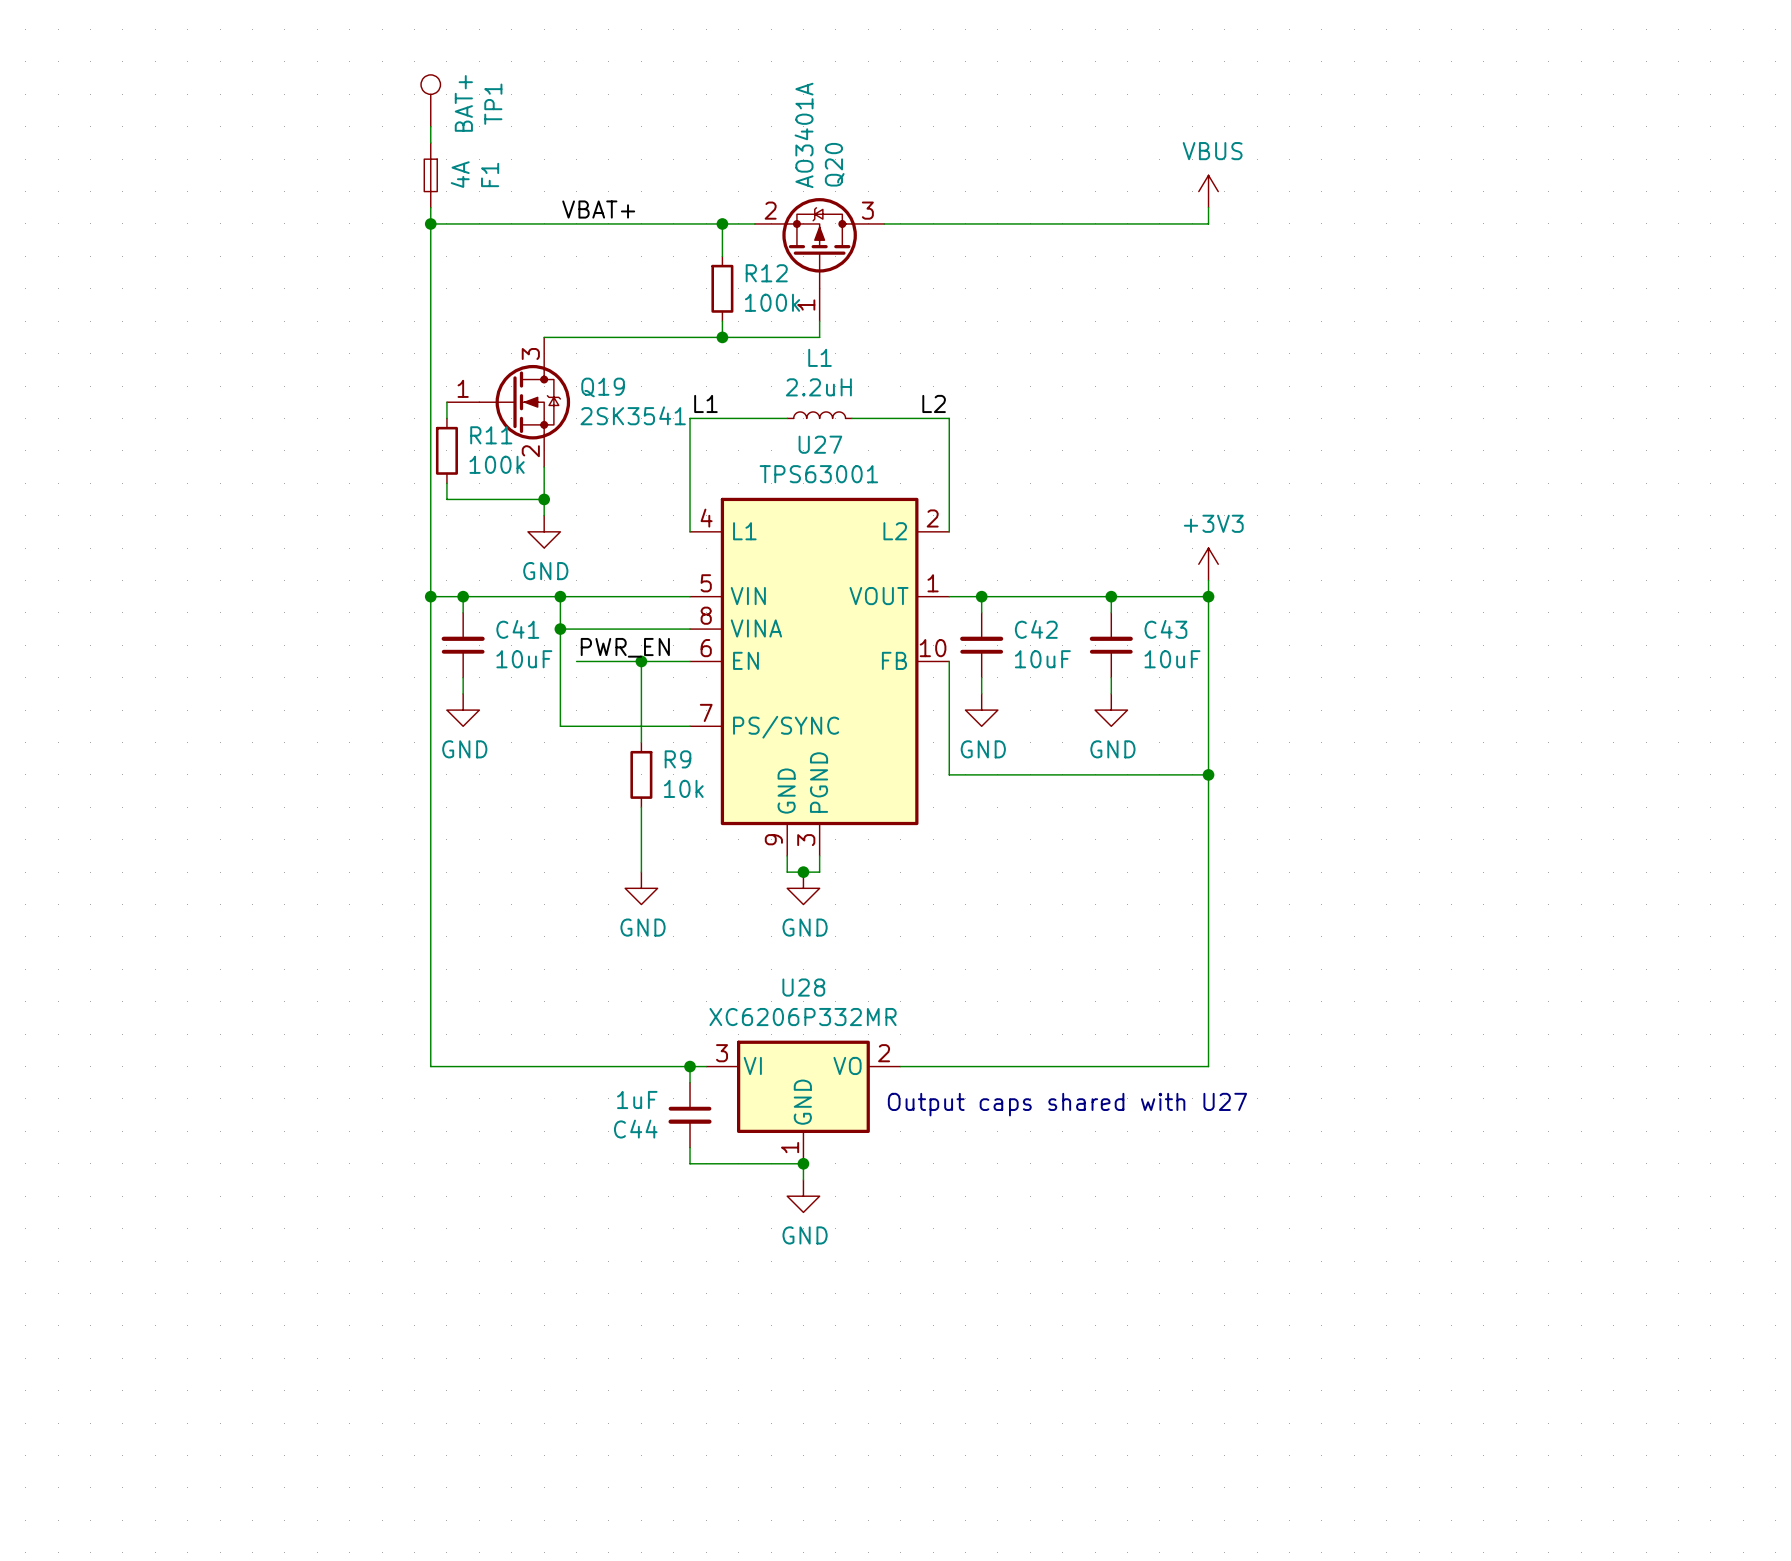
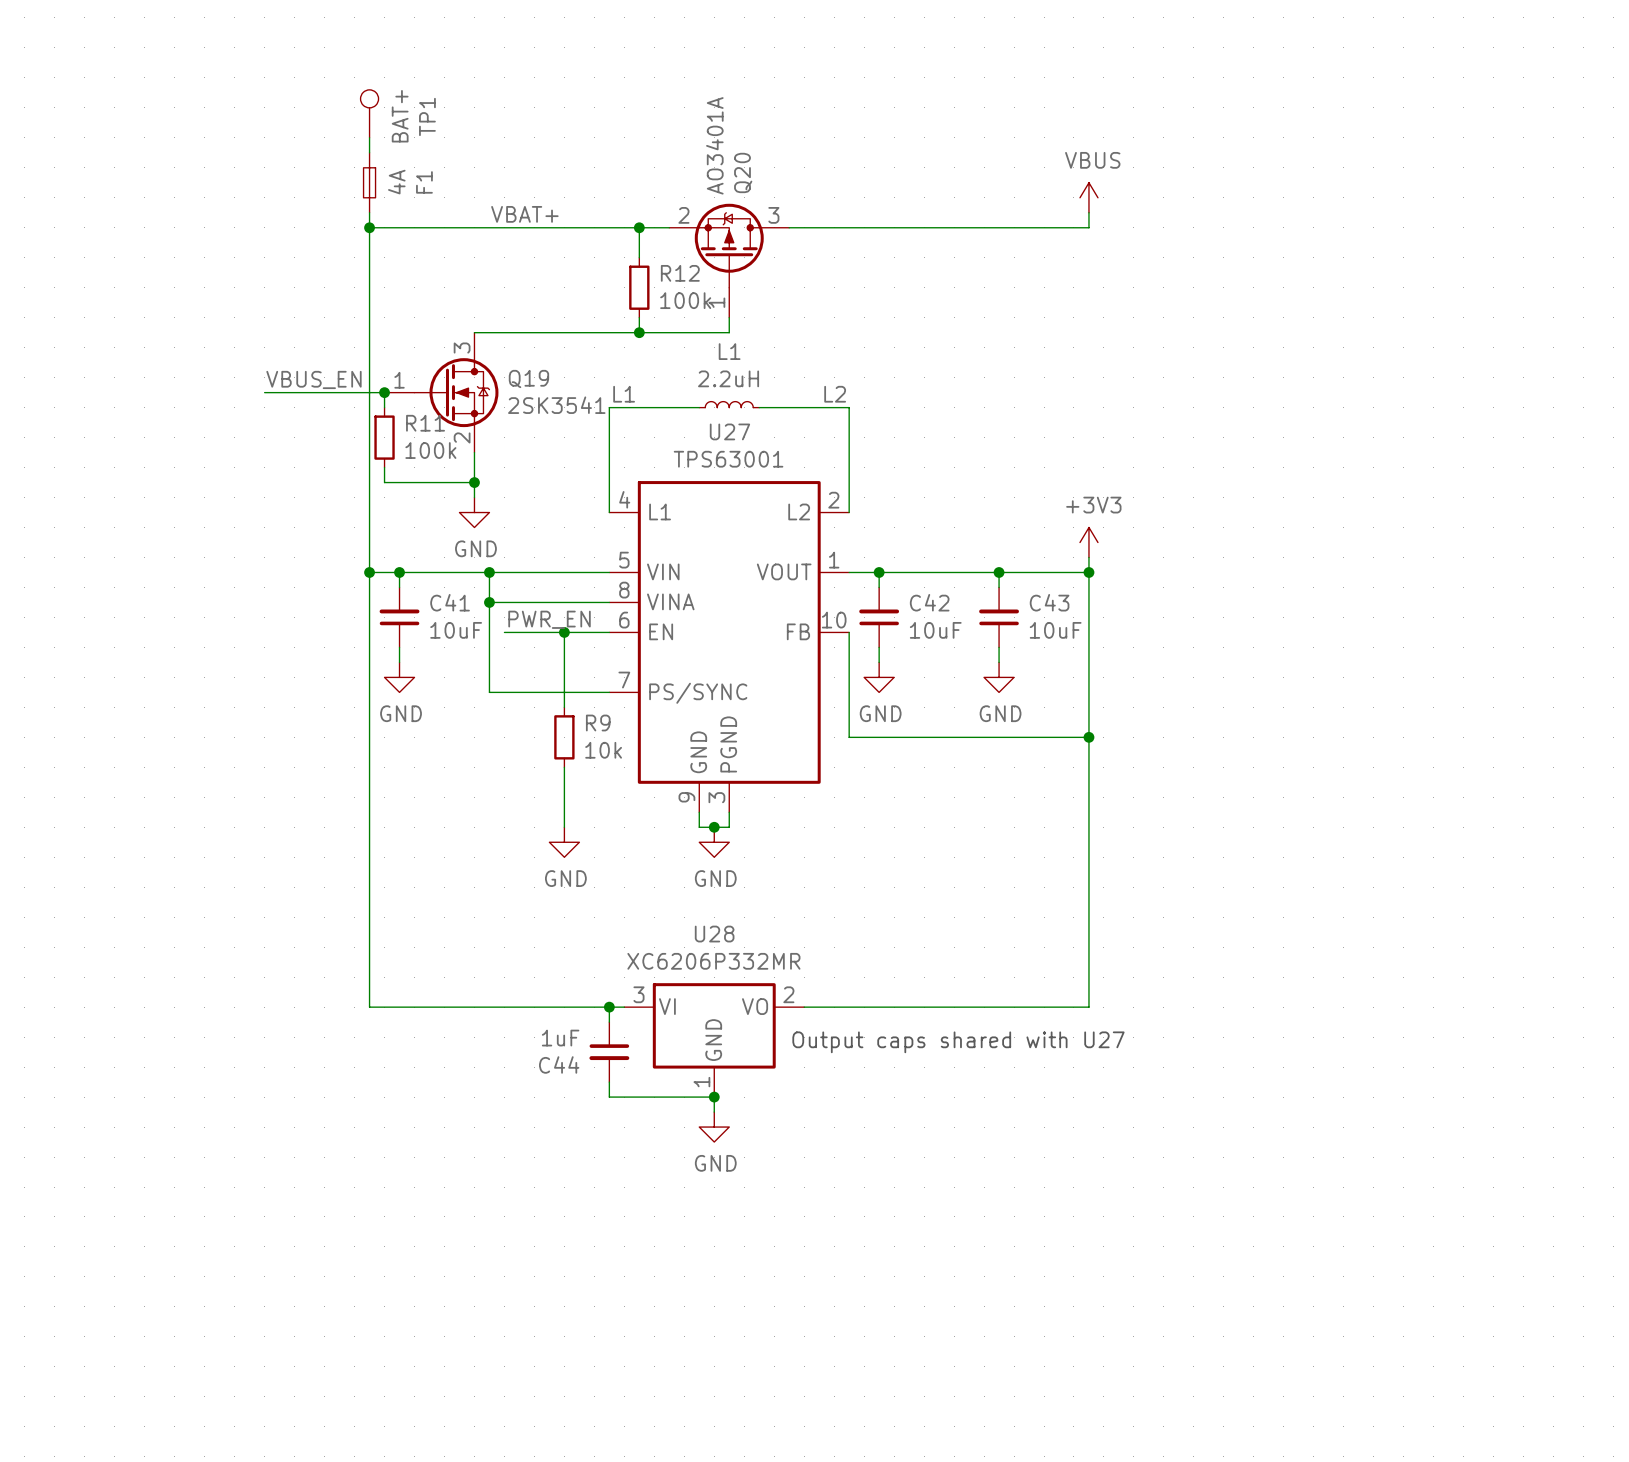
label: none -> VBUS_EN (313, 379)
wire: none -> (264, 392) (384, 392)
junction: none -> (384, 392)

